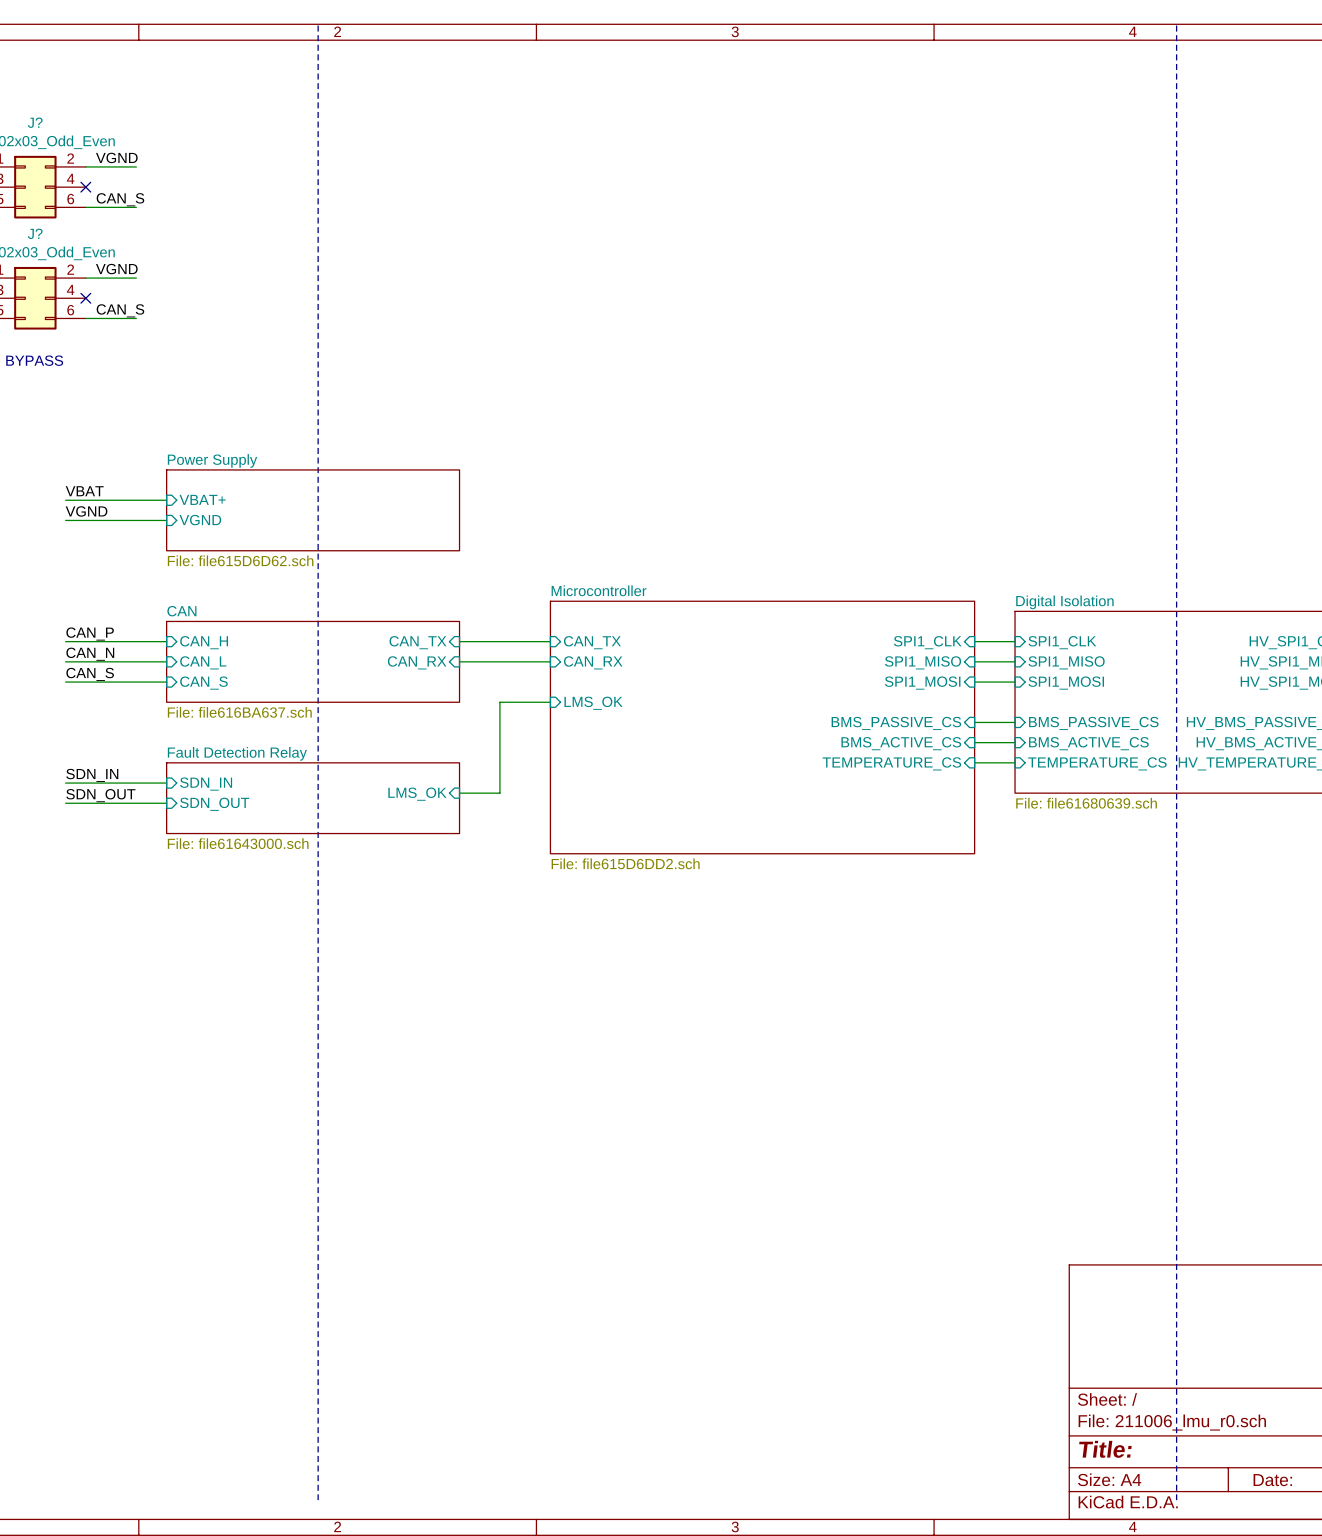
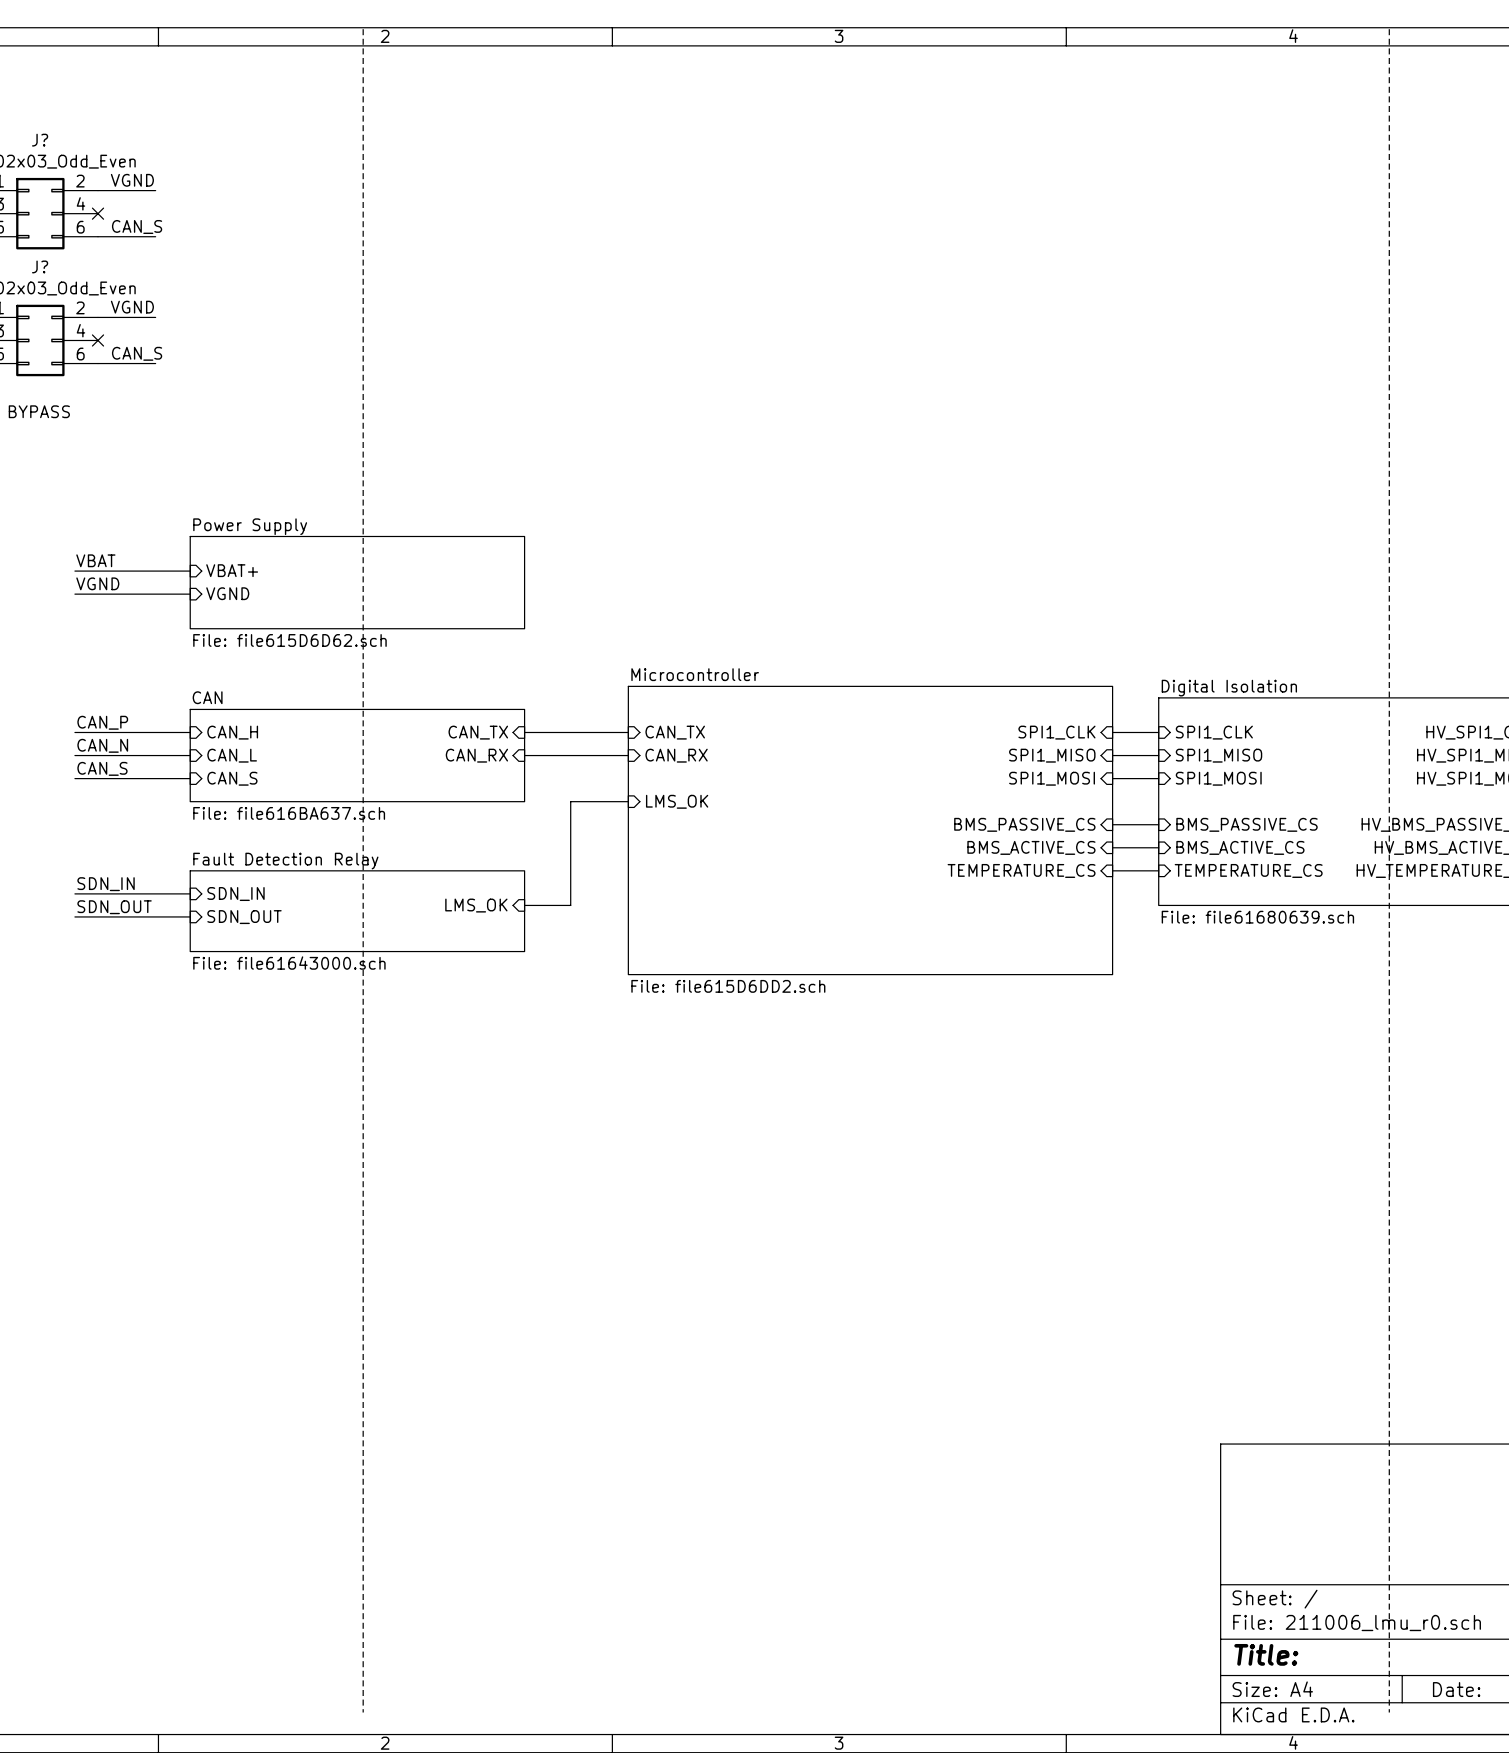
line: (1176, 25) (1176, 1500) -> (1389, 29) (1389, 1712)

